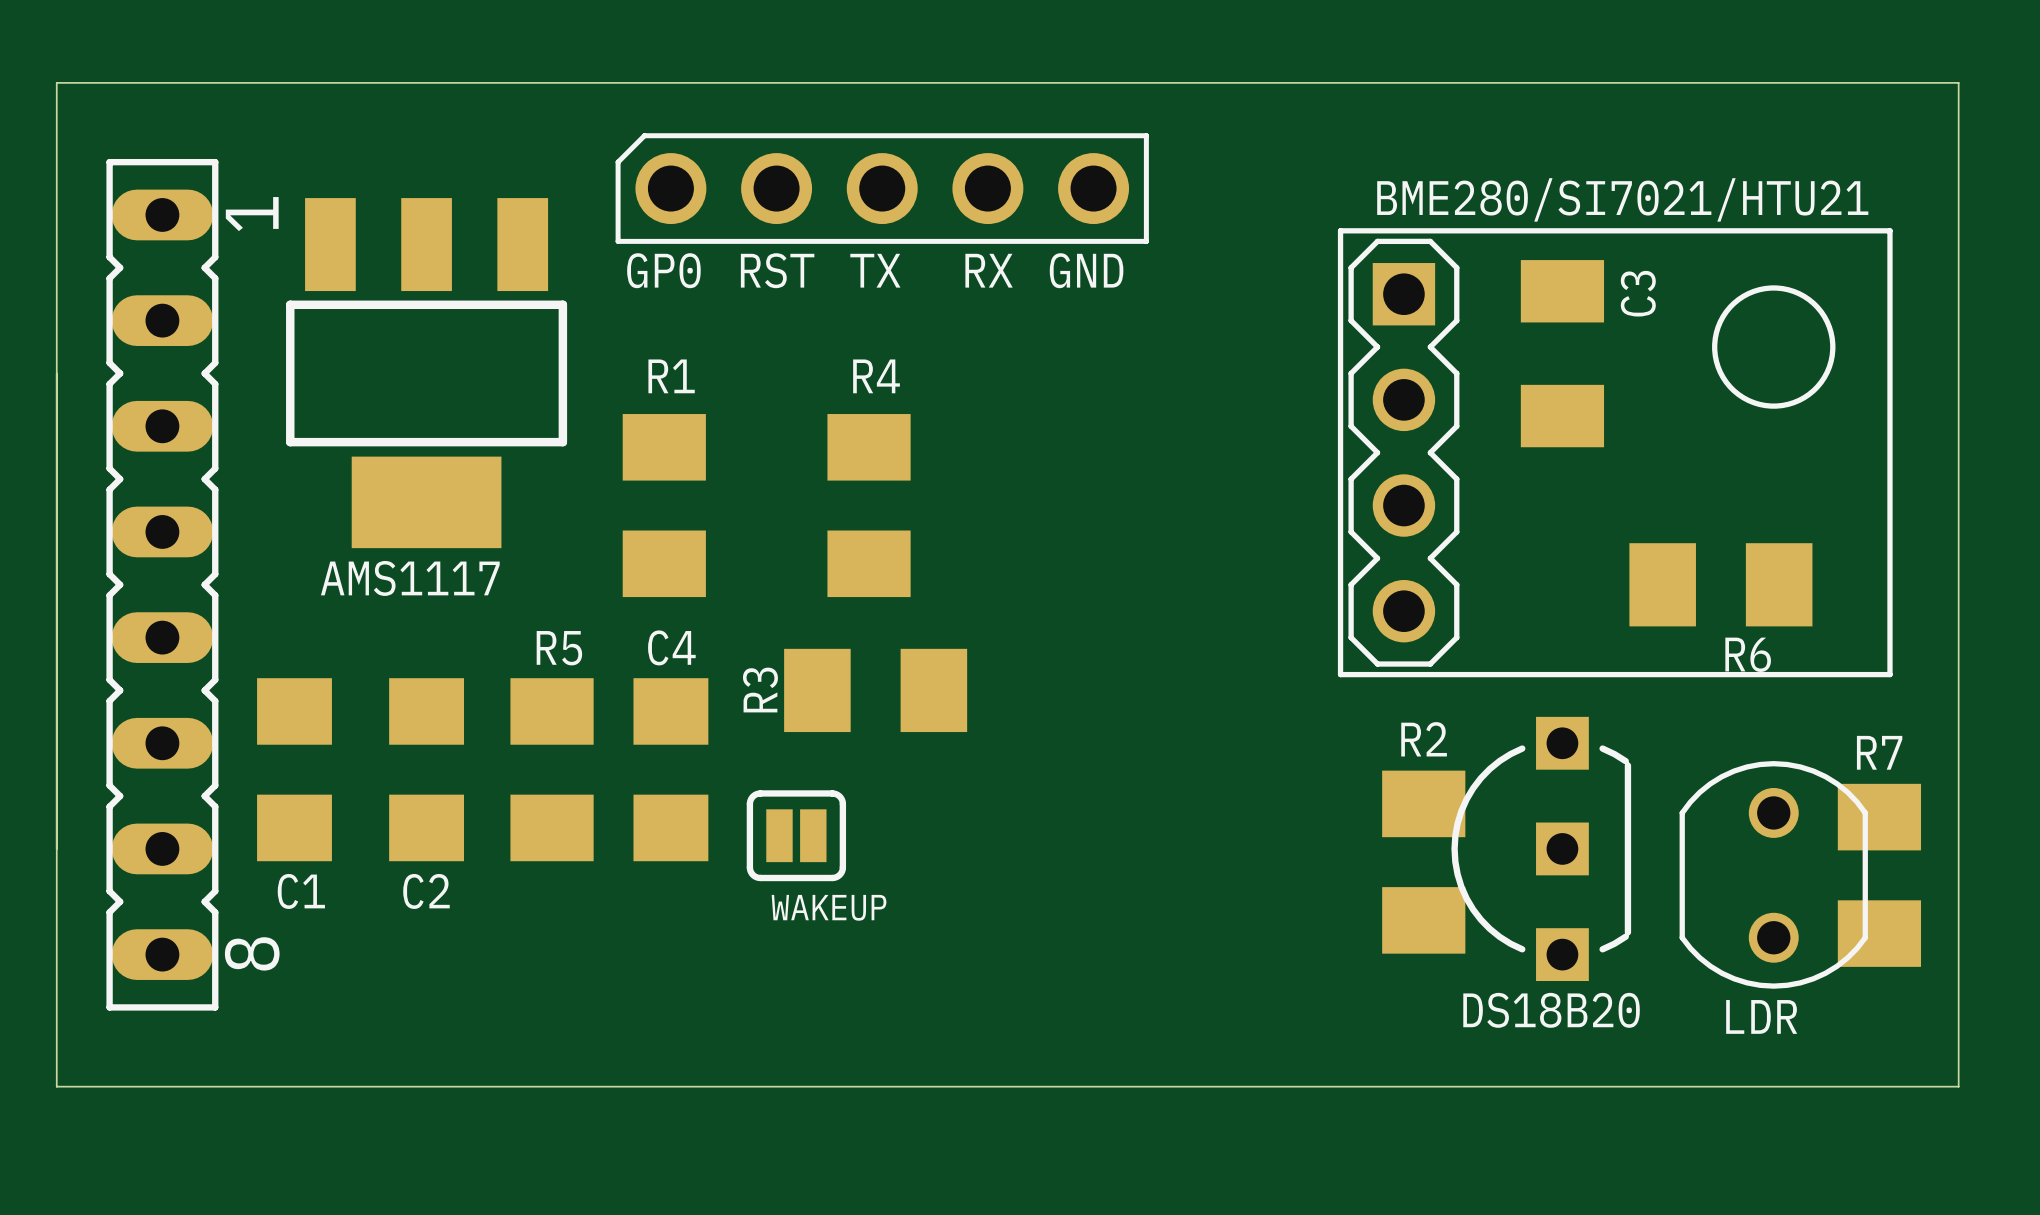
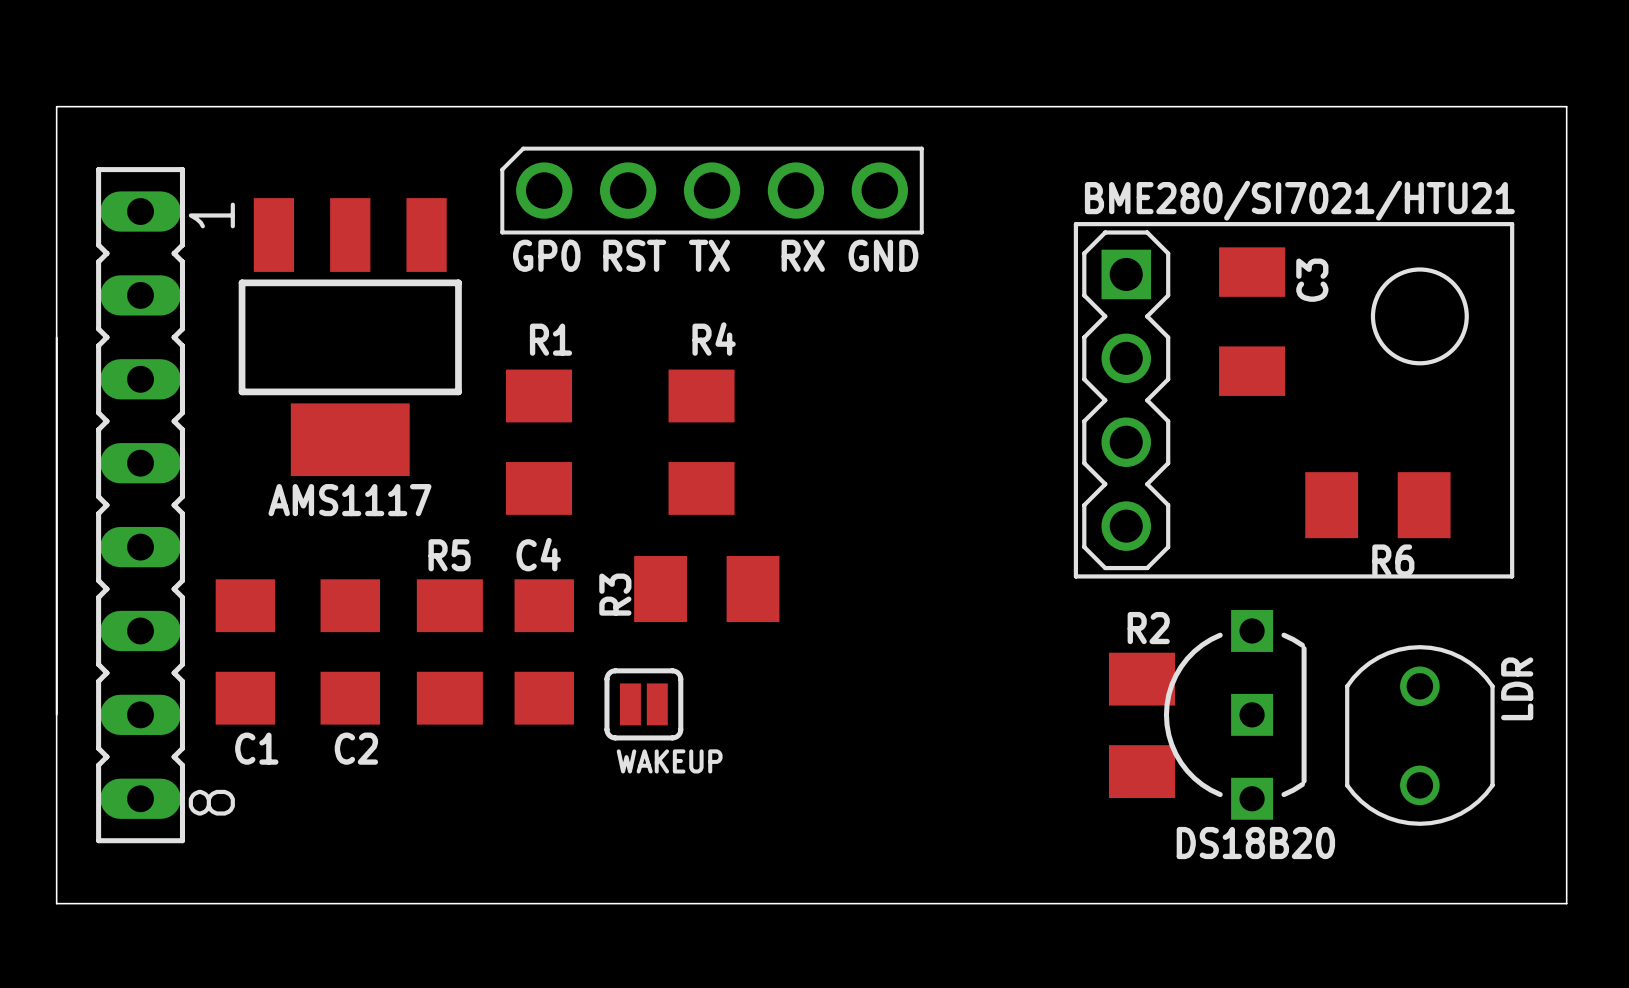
R7: (1879, 875) -> none
LDR name rotation: 0° (1761, 1016) -> 90° counterclockwise (1517, 688)
LDR name position: LDR (1761, 1016) -> LDR (1517, 688)

